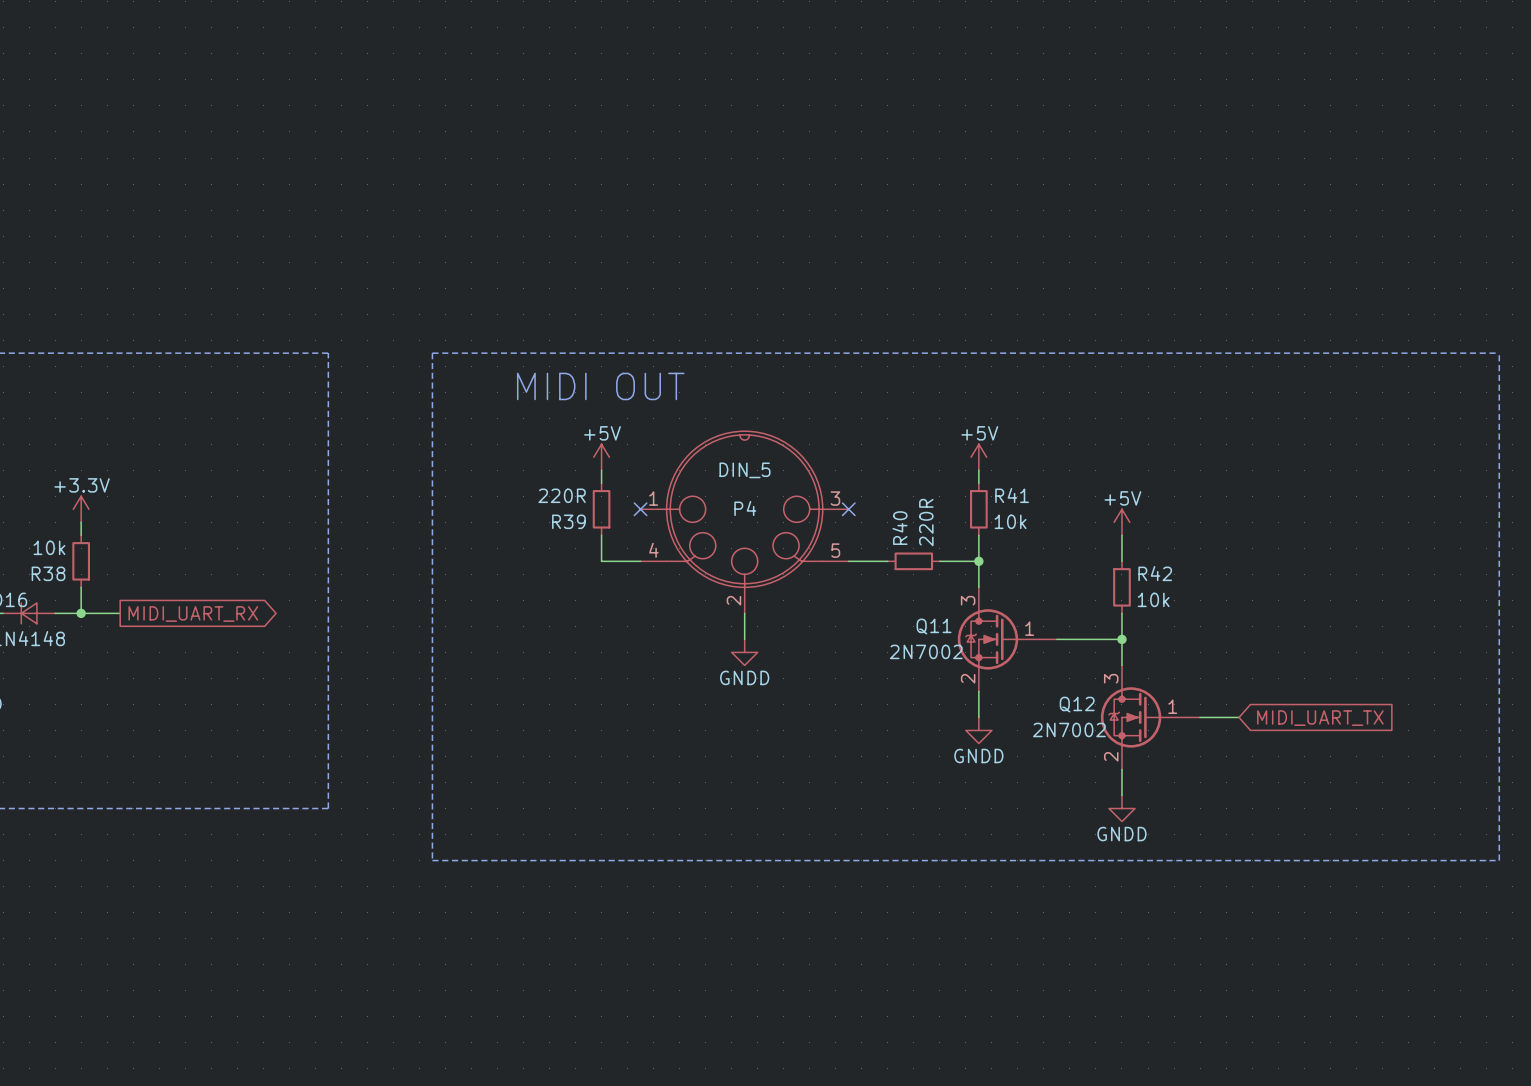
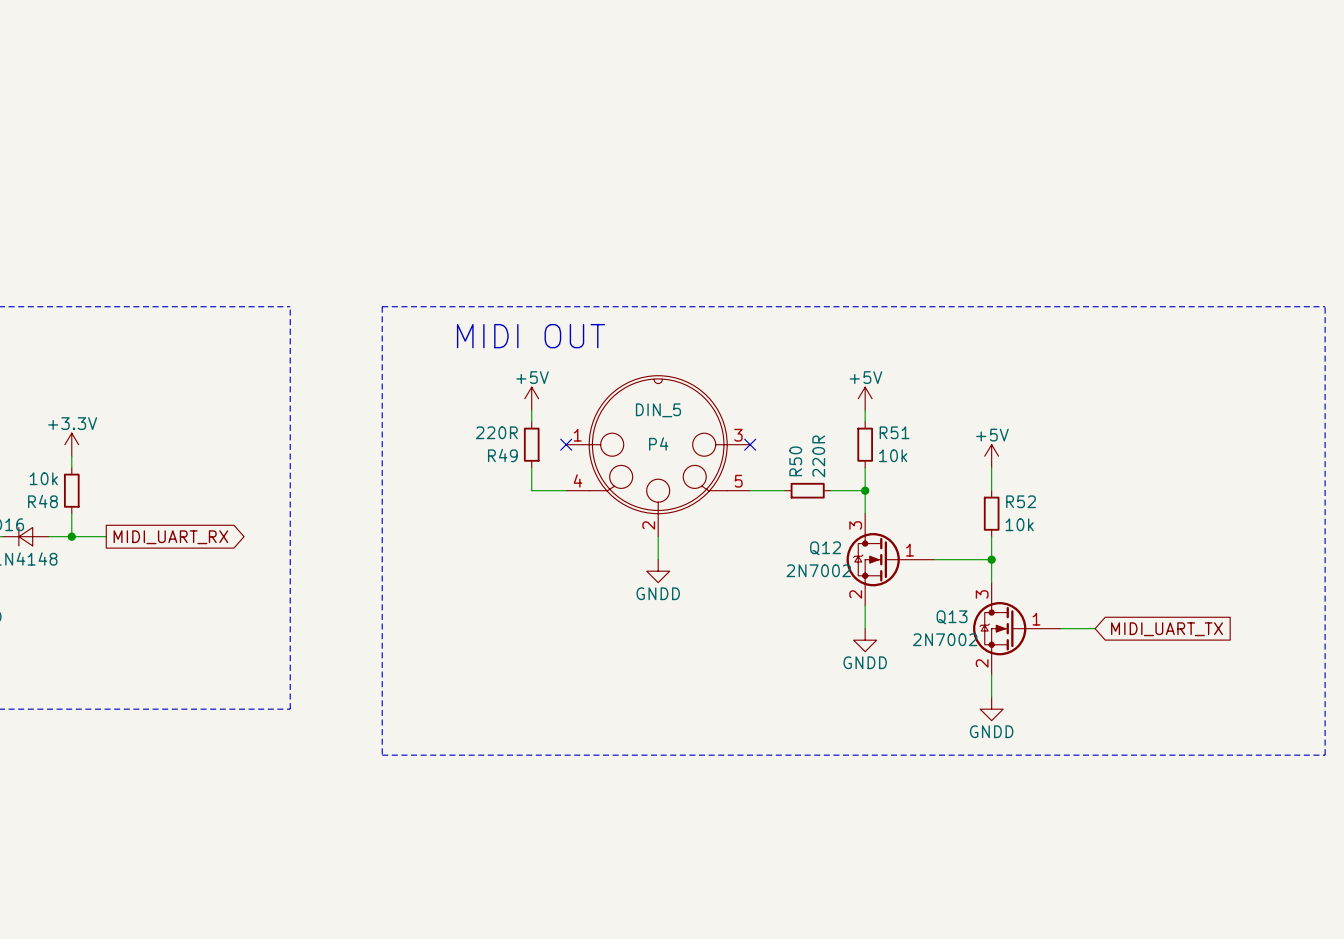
R41 name: R41 (1012, 495) -> R51 (894, 432)
R39 name: R39 (568, 521) -> R49 (502, 455)
R40 name: R40 (900, 528) -> R50 (795, 461)
R38 name: R38 (48, 573) -> R48 (42, 501)
R42 name: R42 (1155, 573) -> R52 (1021, 501)
Q11 name: Q11 (934, 626) -> Q12 (825, 548)
Q12 name: Q12 (1077, 704) -> Q13 (952, 617)

